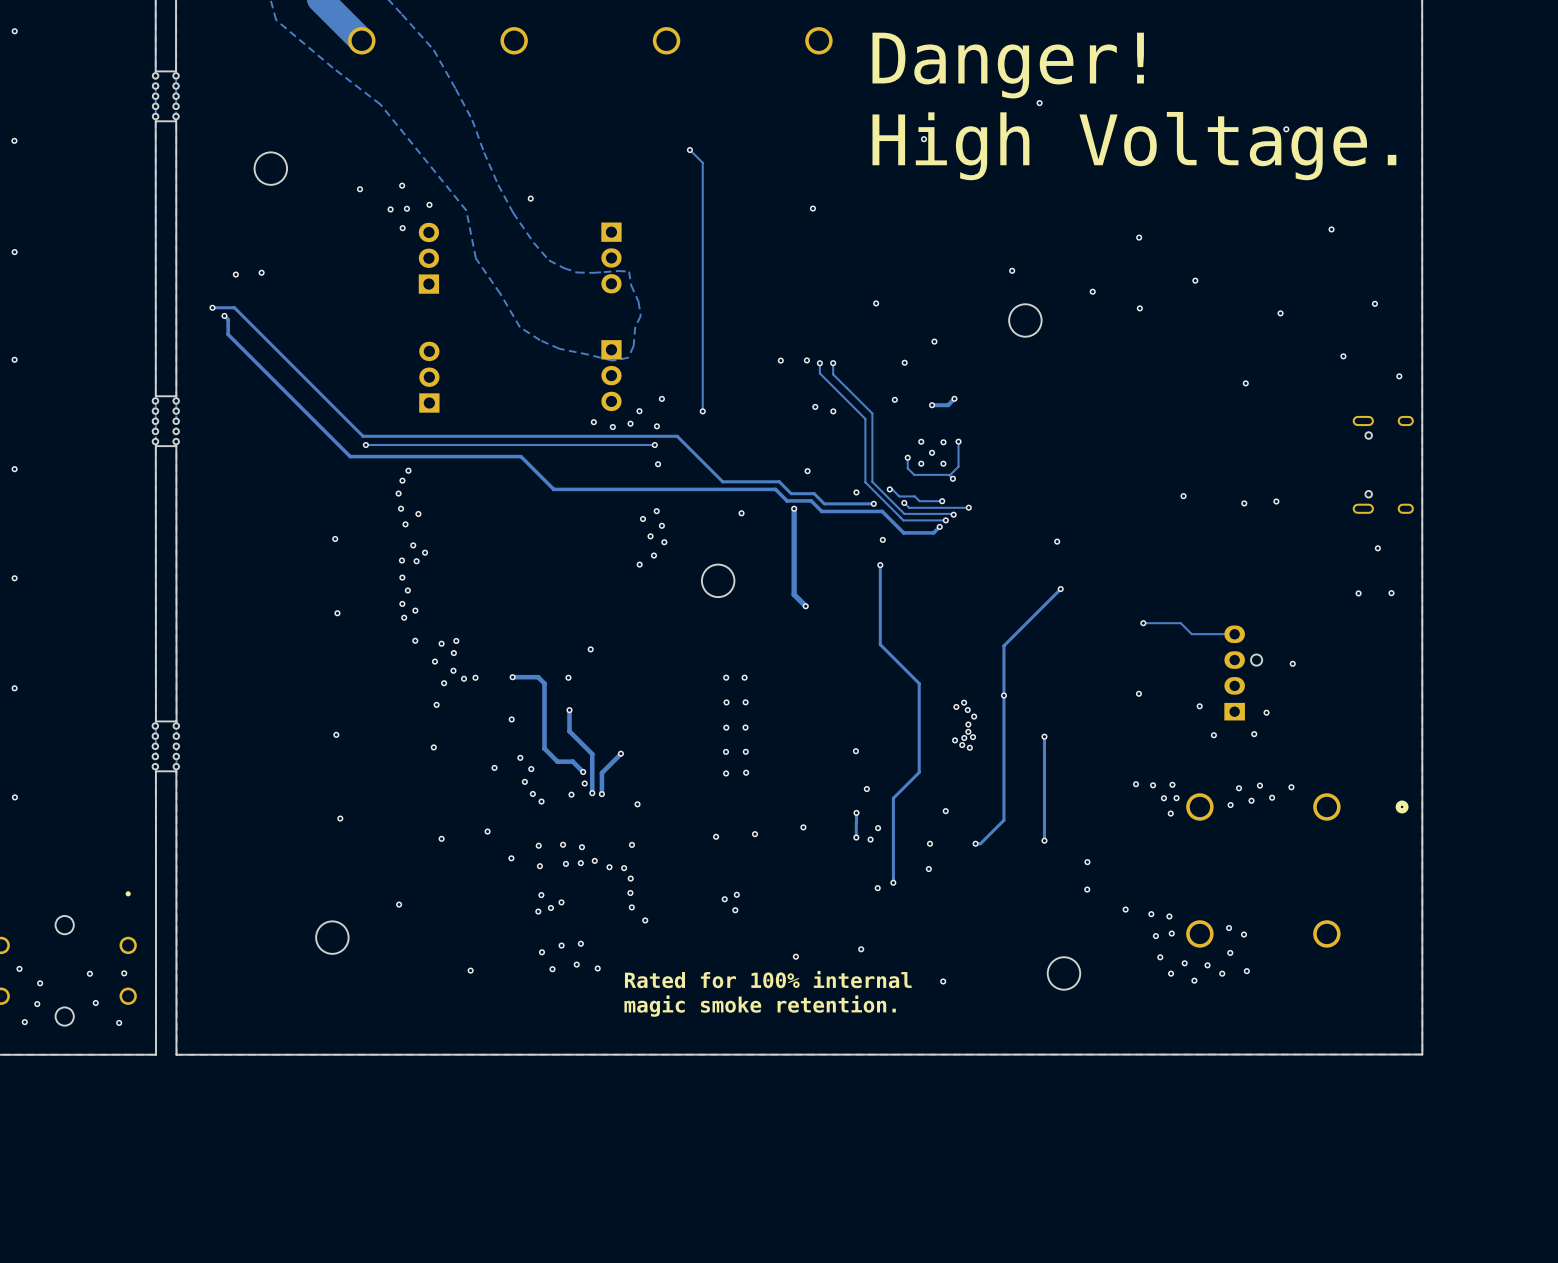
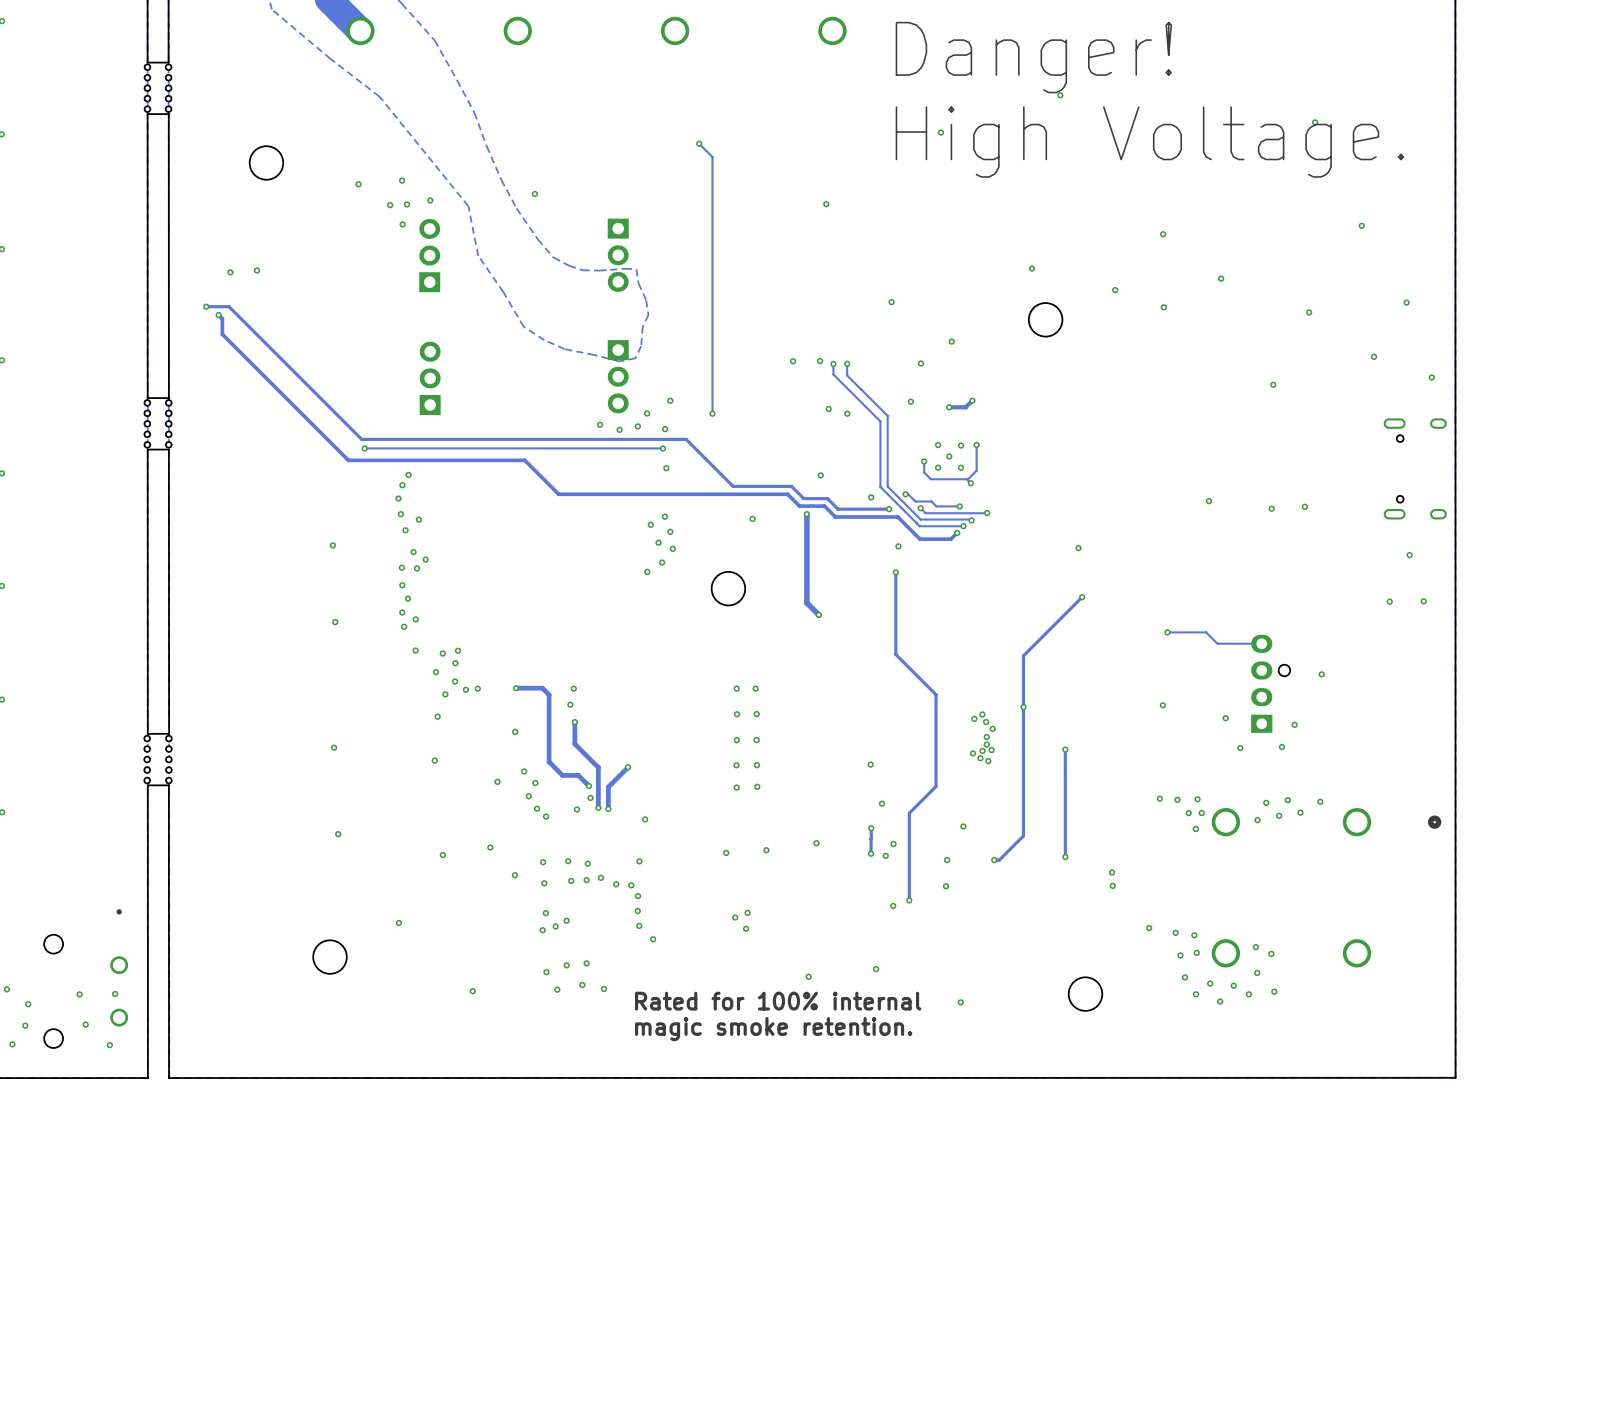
via position: (590, 649) -> (570, 704)
via: none -> (1112, 872)
via: (1087, 862) -> none
via: none -> (1112, 885)
via: (1087, 889) -> none

